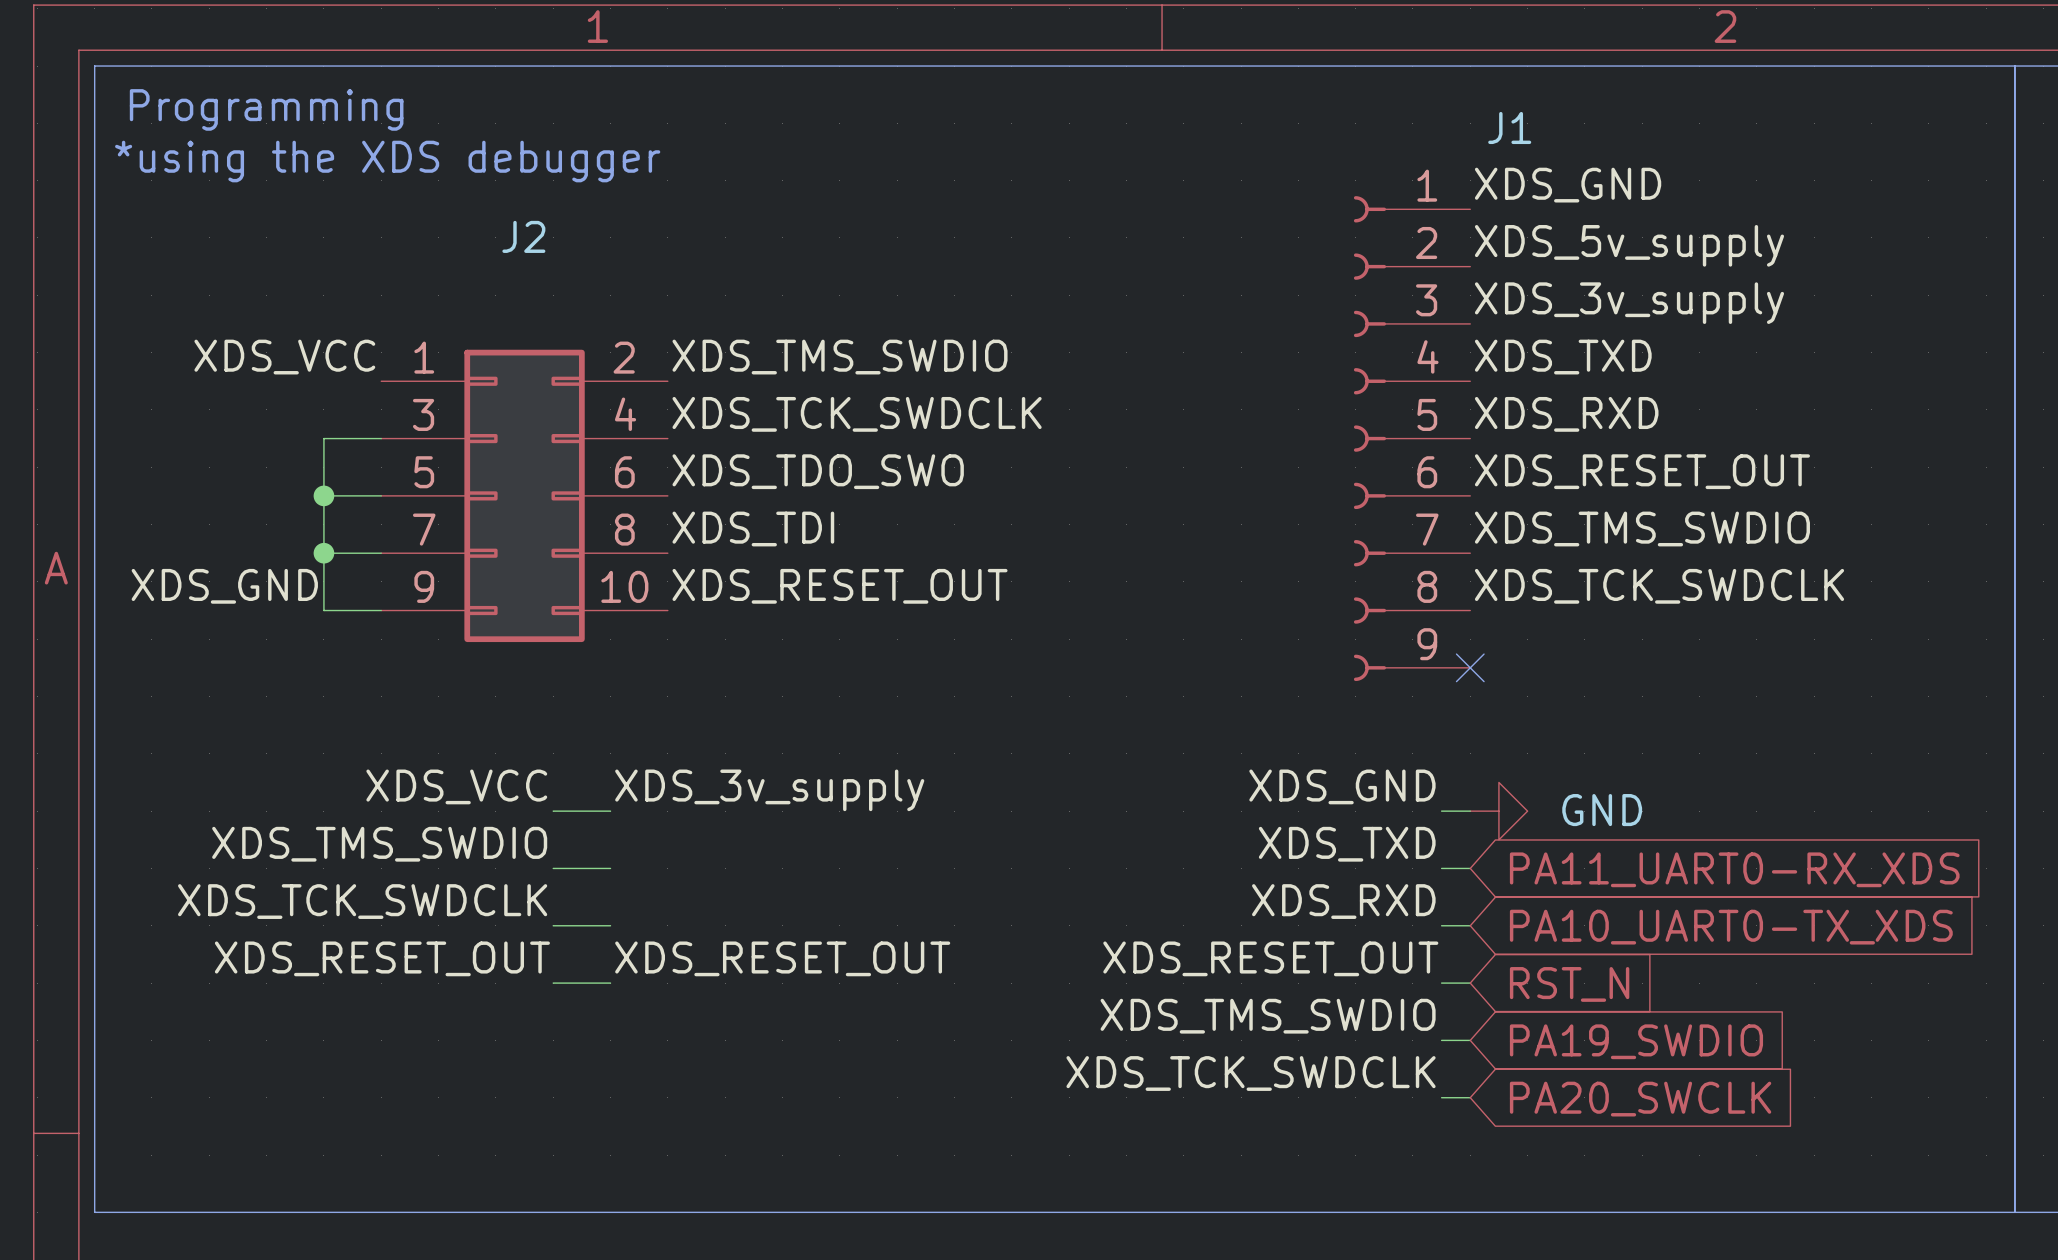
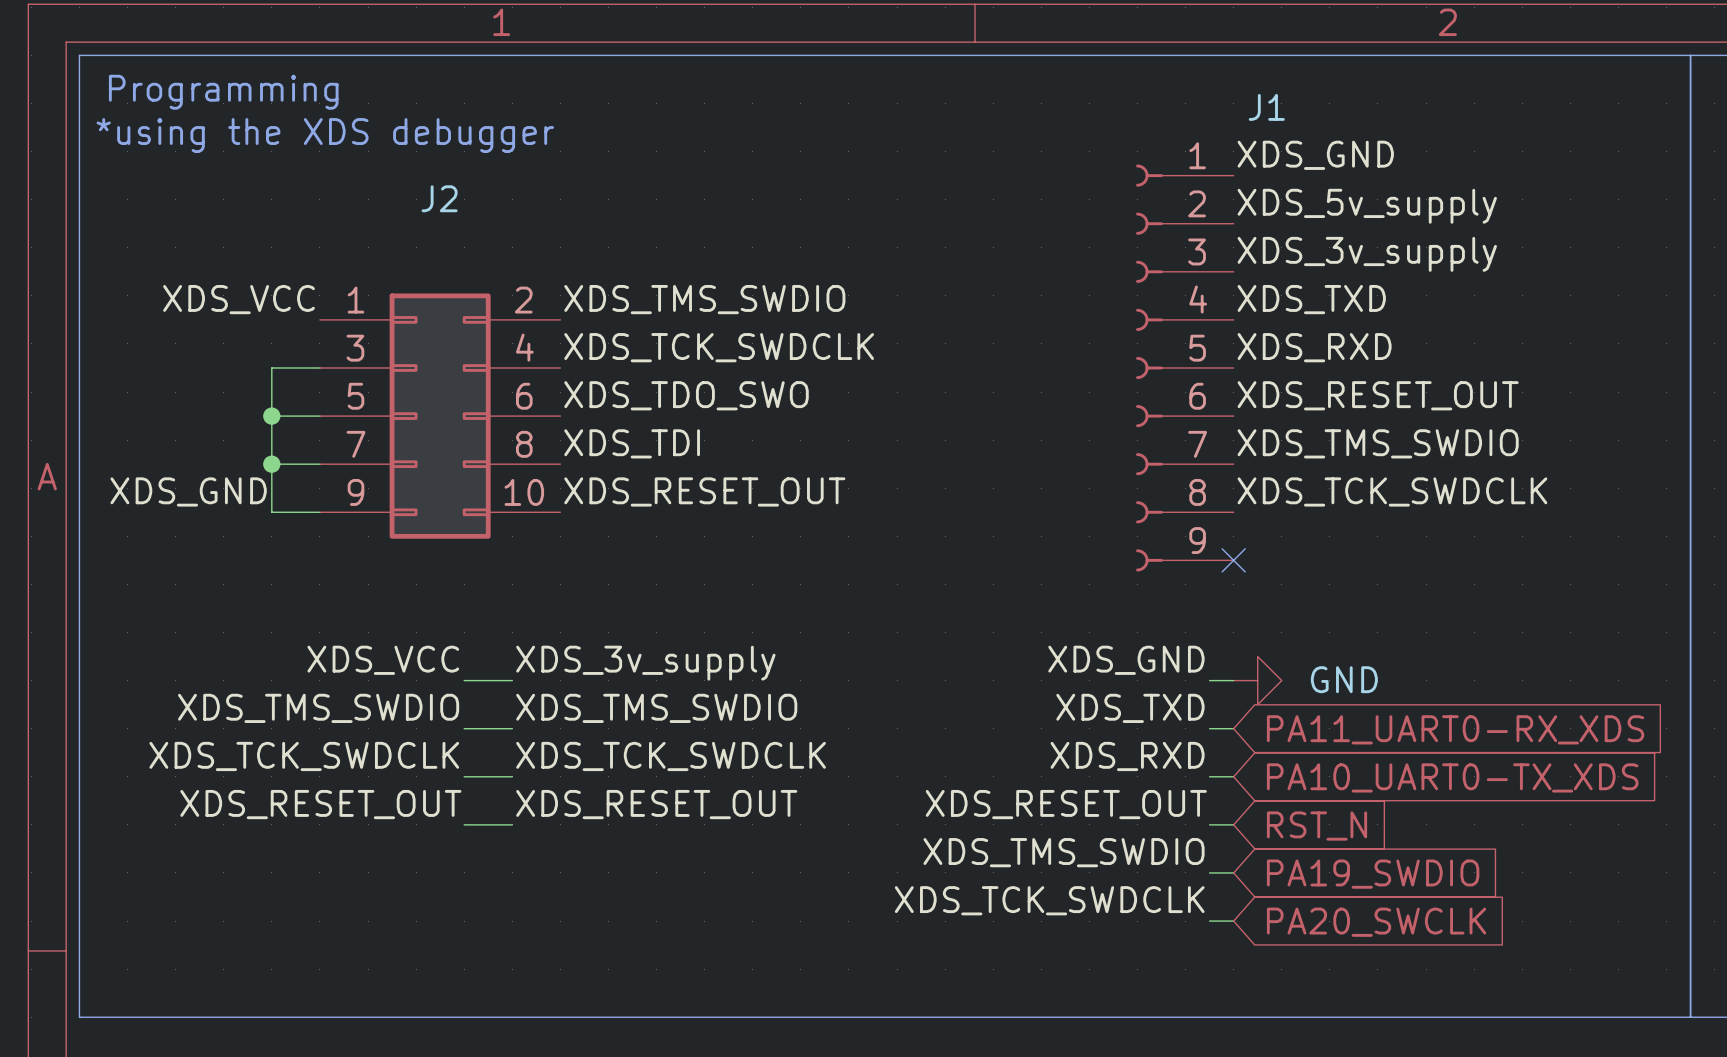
label: none -> XDS_TMS_SWDIO (656, 708)
label: none -> XDS_TCK_SWDCLK (671, 756)

